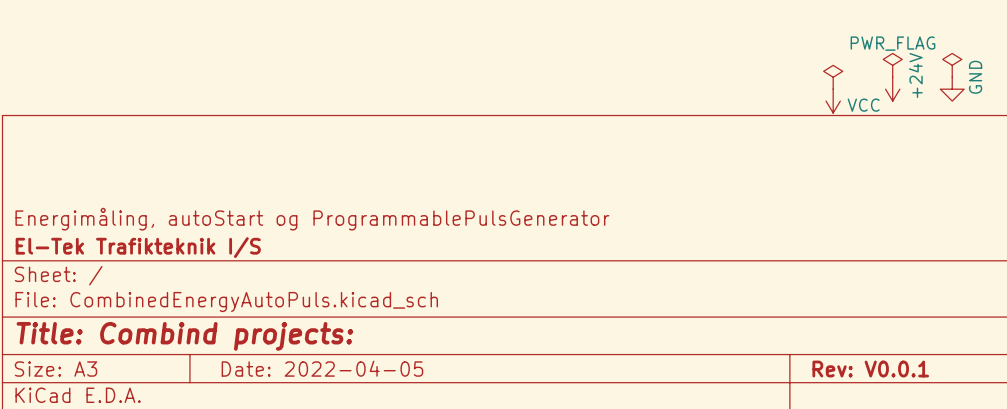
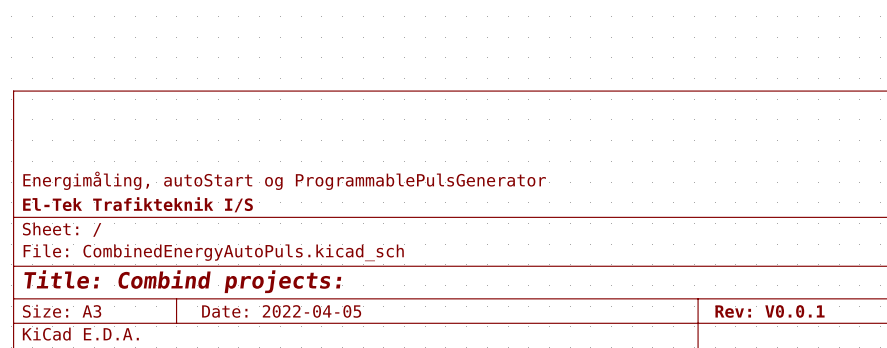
power symbol: PWR_FLAG (892, 65) -> none
power symbol: (952, 65) -> none
power symbol: (833, 77) -> none
power symbol: +24V (892, 89) -> none
power symbol: GND (952, 89) -> none
power symbol: VCC (833, 101) -> none

